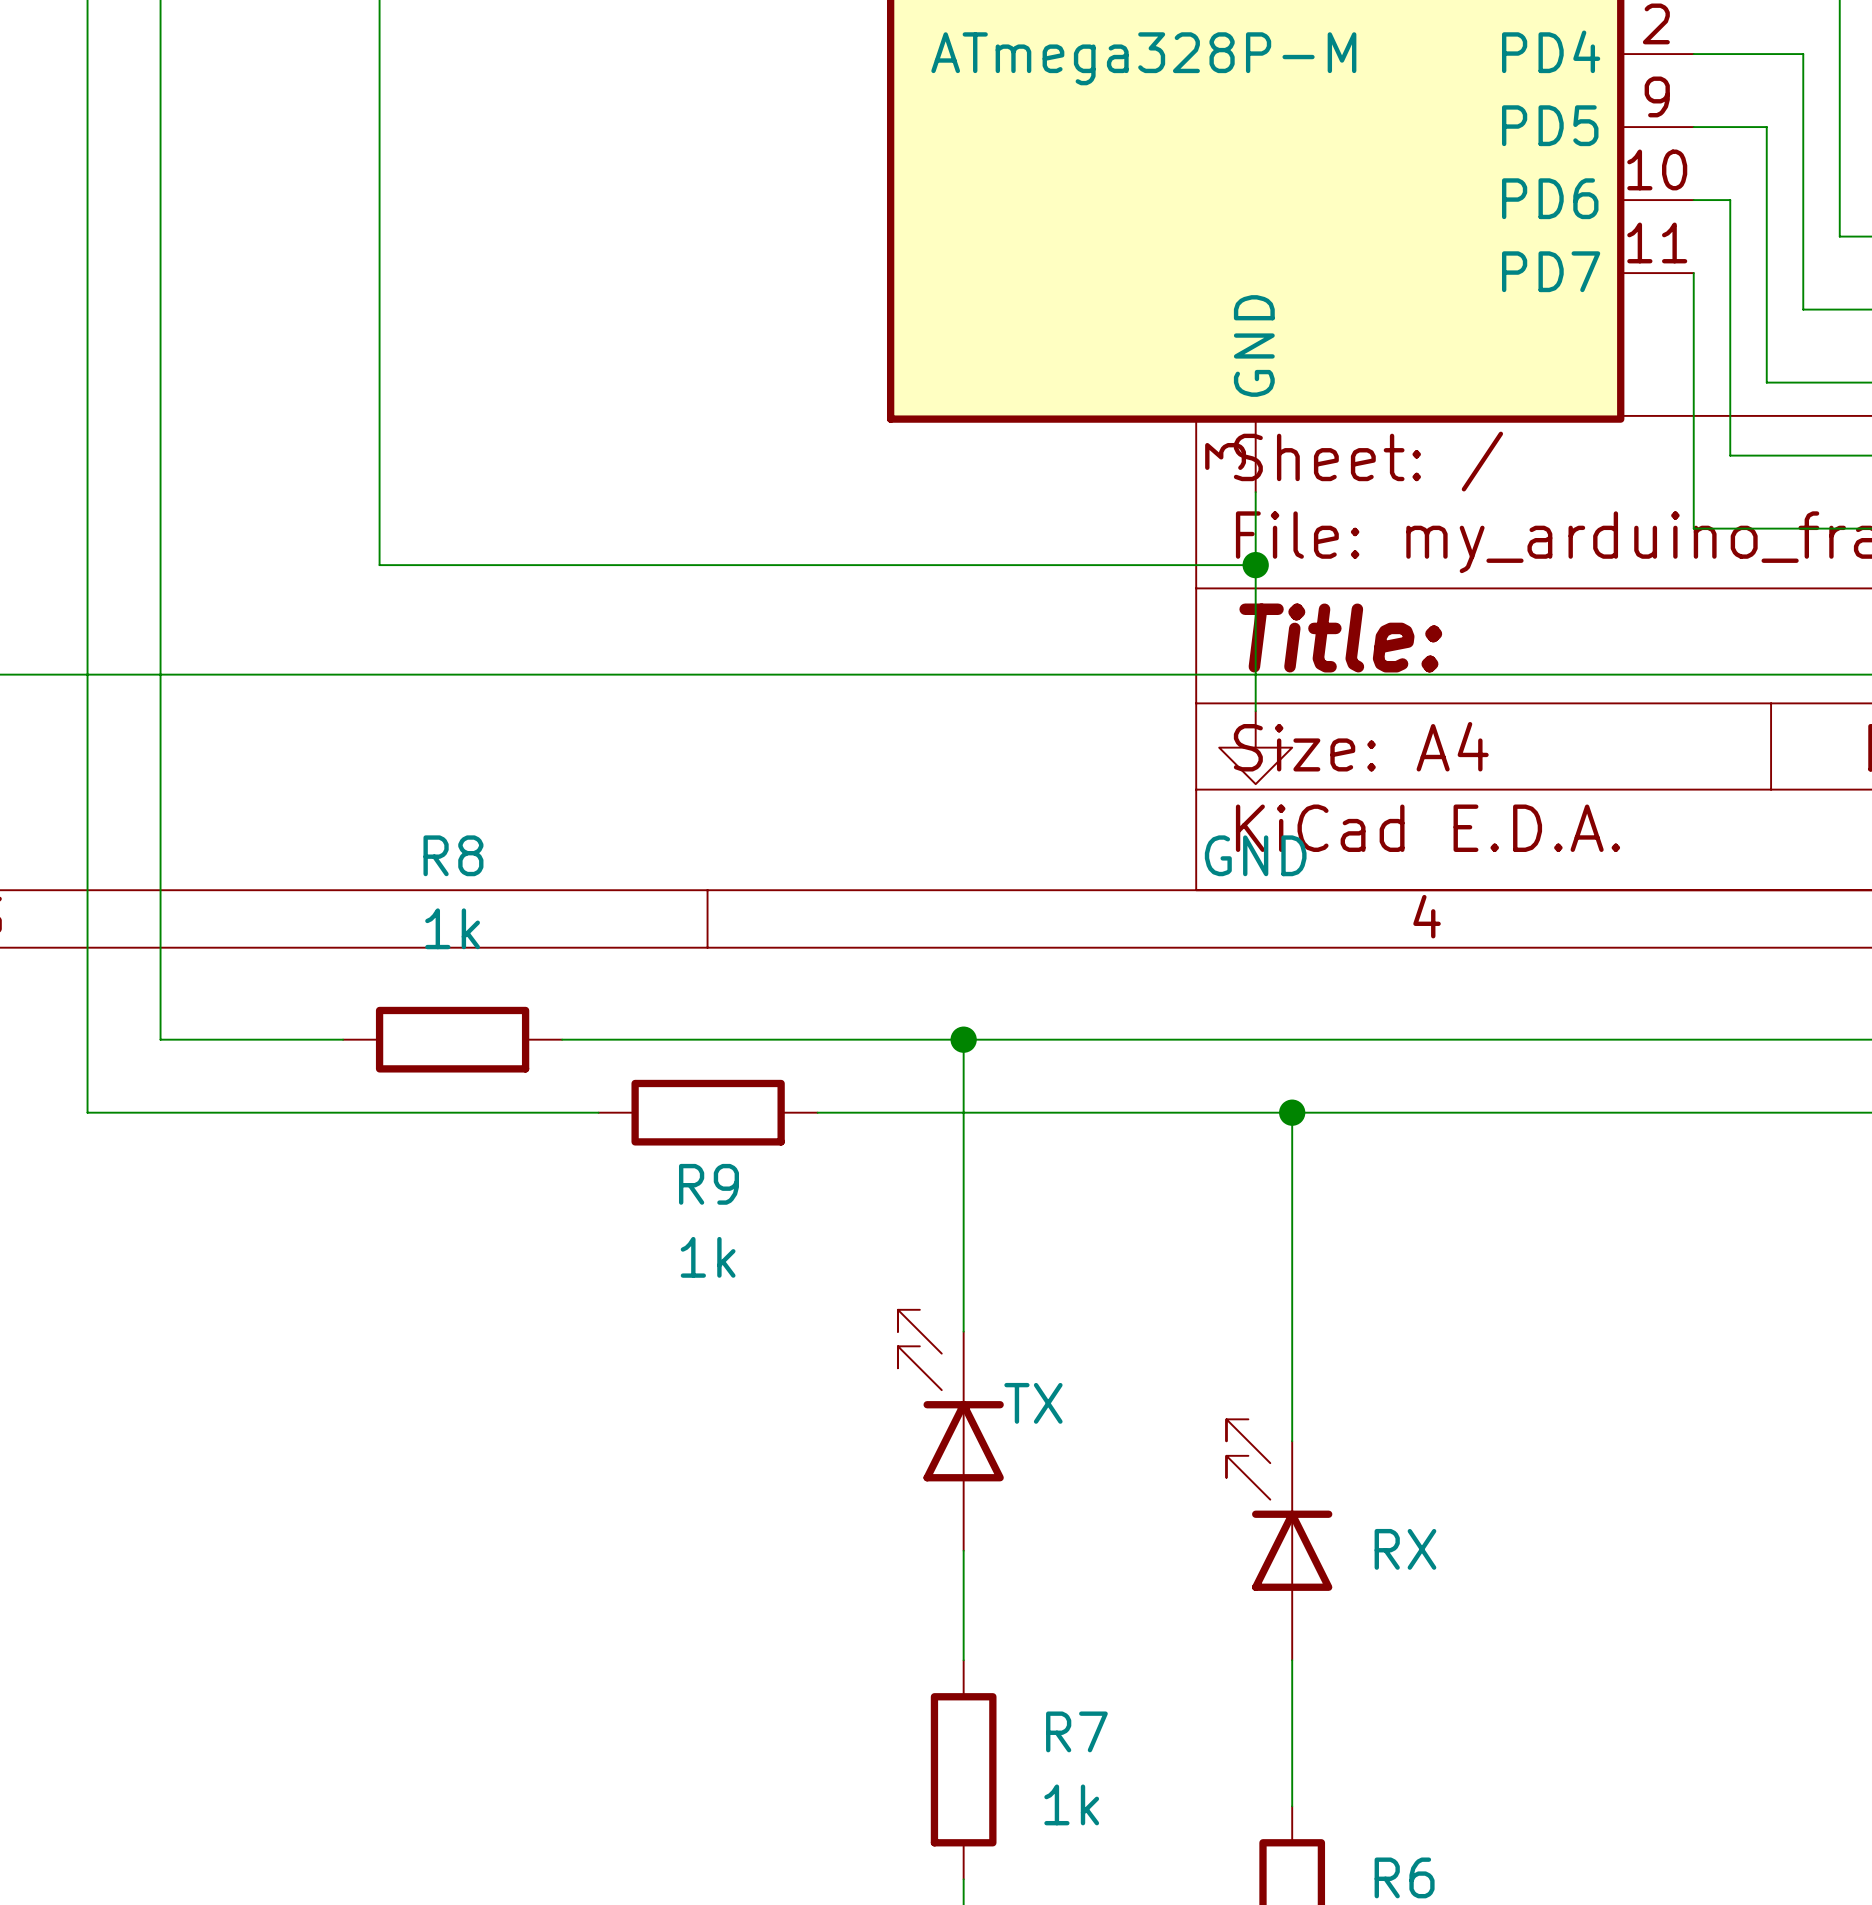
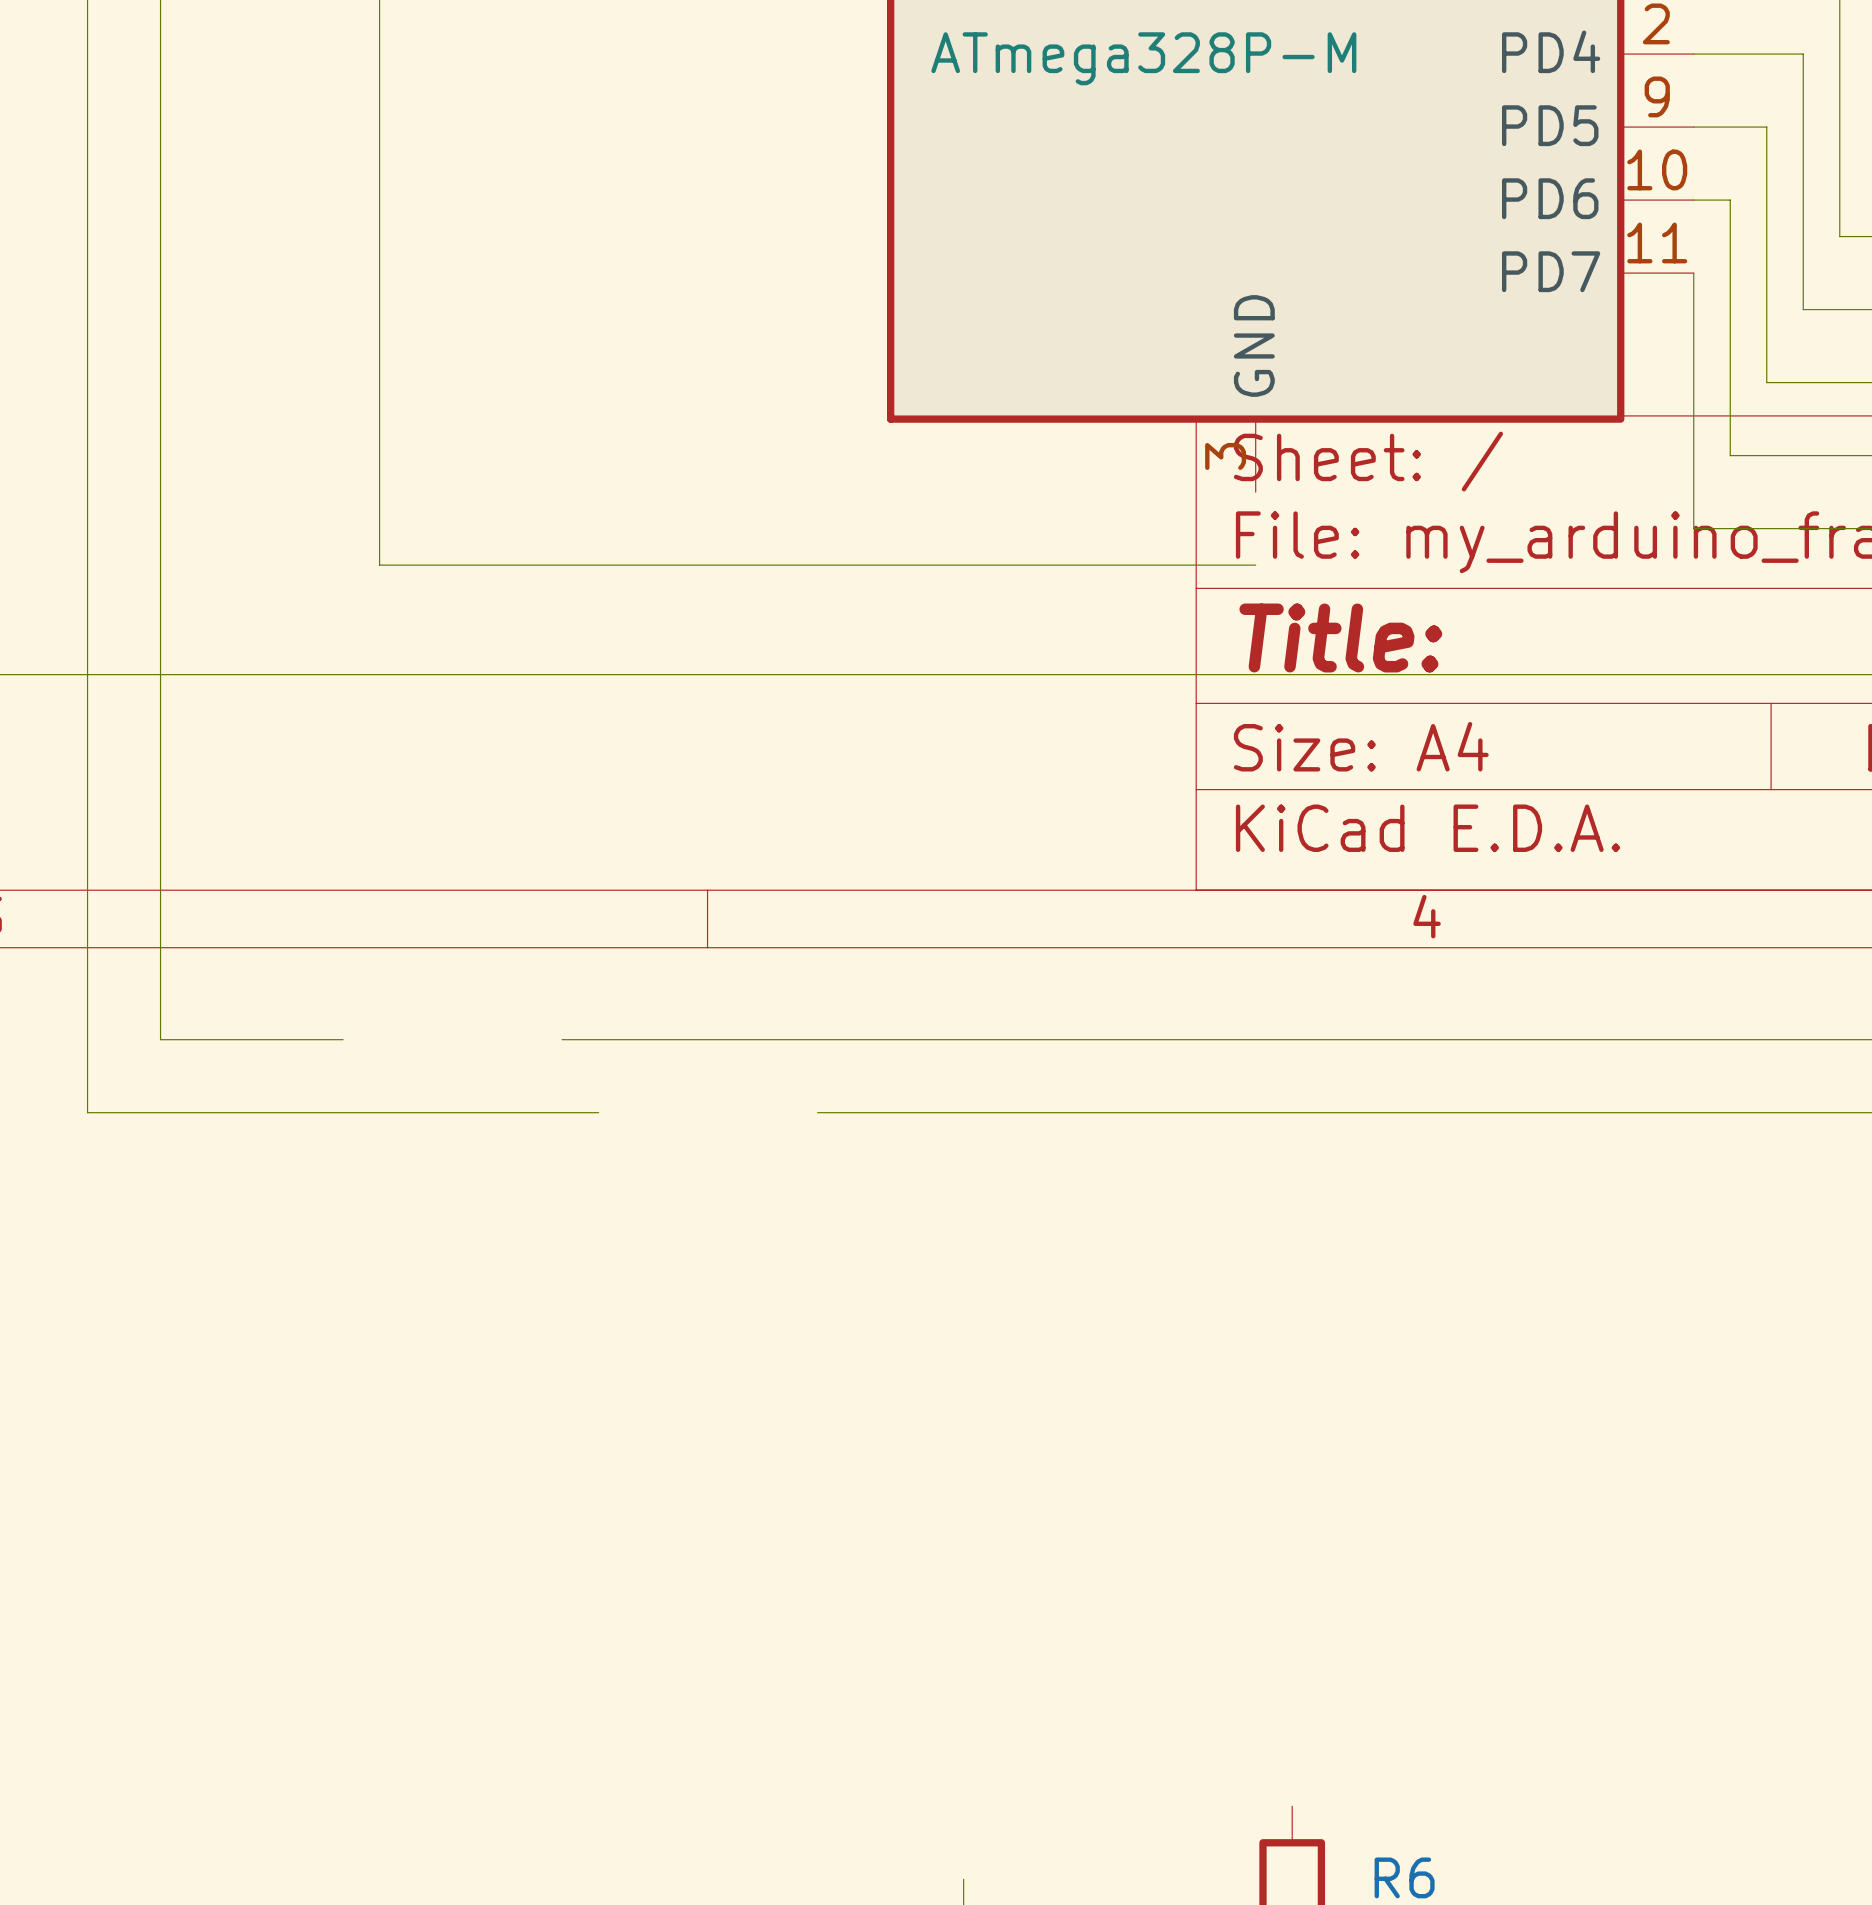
wire: (1255, 492) (1255, 711) -> none
junction: (1255, 565) -> none
power symbol: GND (1255, 747) -> none
R8: 1k (452, 1039) -> none
wire: (963, 1039) (963, 1331) -> none
junction: (963, 1039) -> none
R9: 1k (708, 1112) -> none
wire: (1292, 1112) (1292, 1441) -> none
junction: (1292, 1112) -> none
TX: (950, 1430) -> none
RX: (1279, 1539) -> none
wire: (963, 1550) (963, 1660) -> none
wire: (1292, 1660) (1292, 1806) -> none
R7: 1k (963, 1769) -> none

